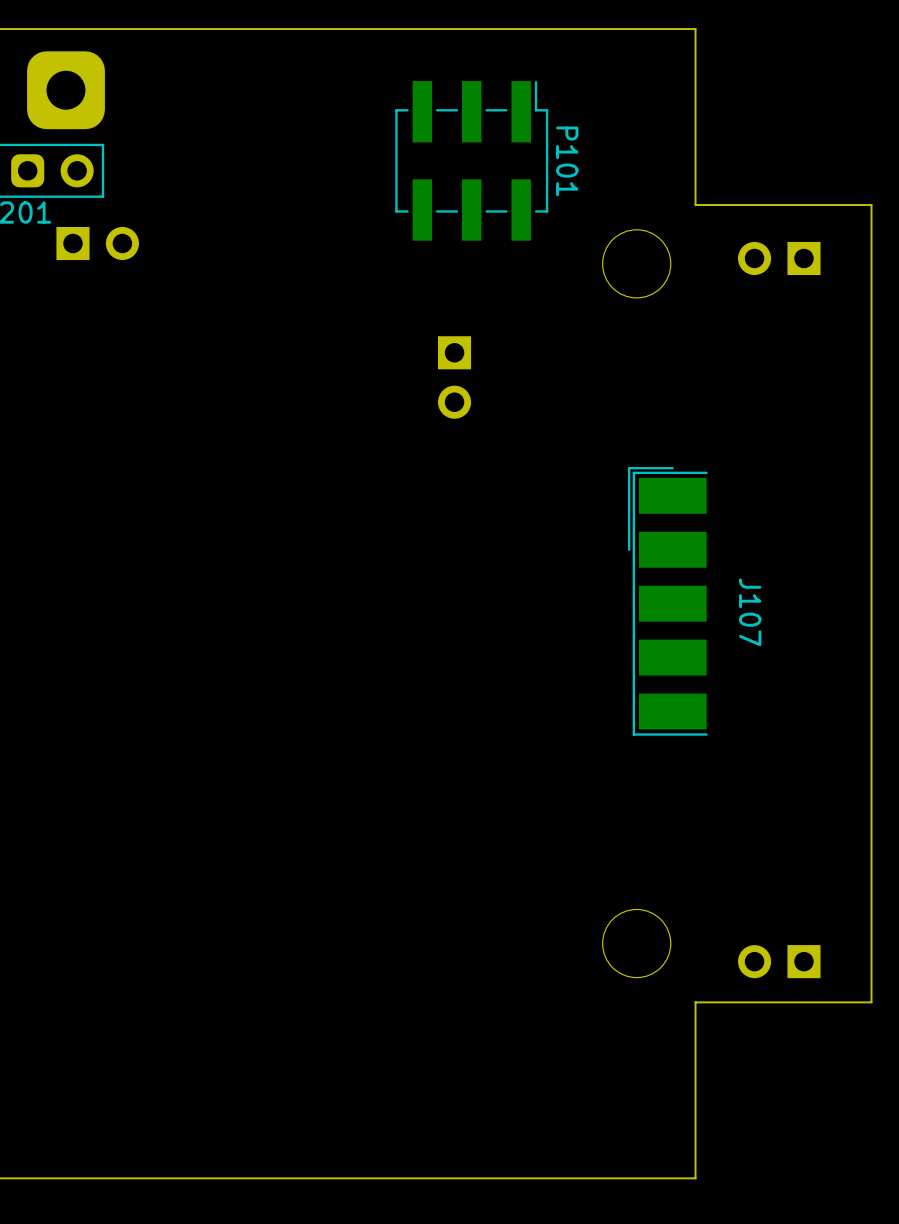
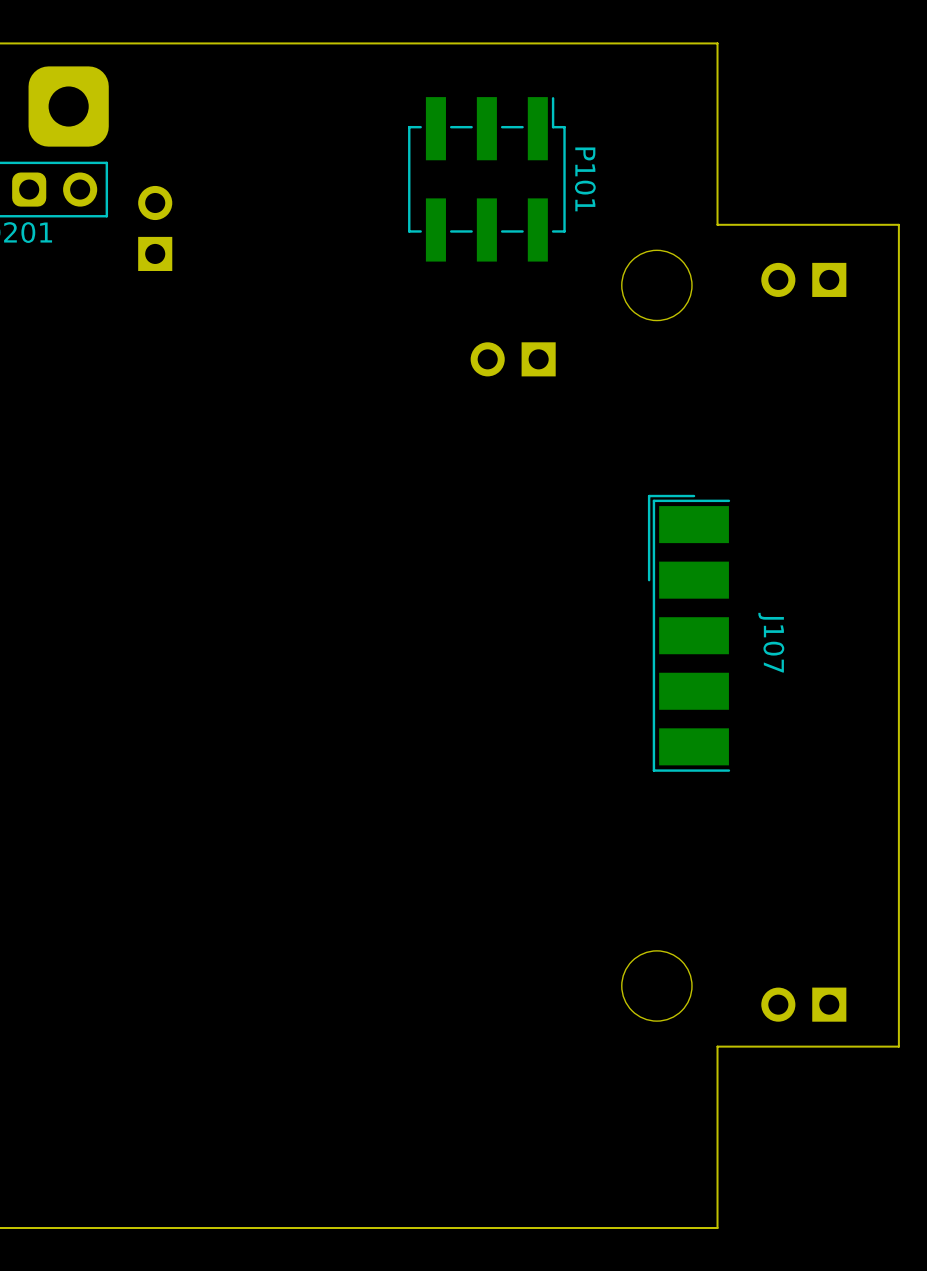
part rotation: 0° (97, 243) -> 90° counterclockwise (155, 228)
part position: (97, 243) -> (155, 228)
part rotation: 0° (454, 377) -> 90° clockwise (513, 359)
part position: (454, 377) -> (513, 359)

